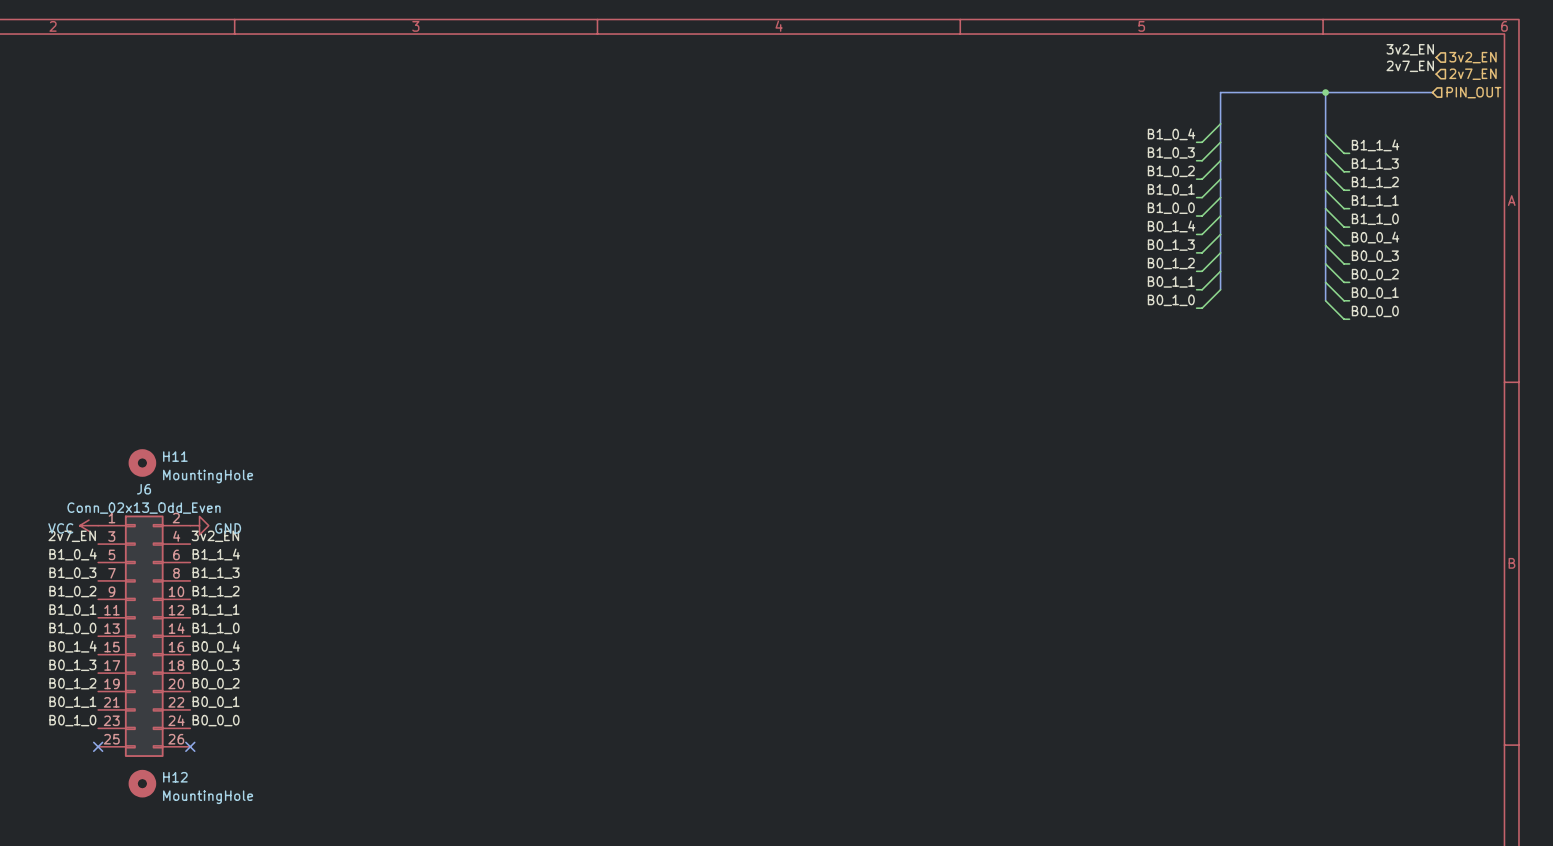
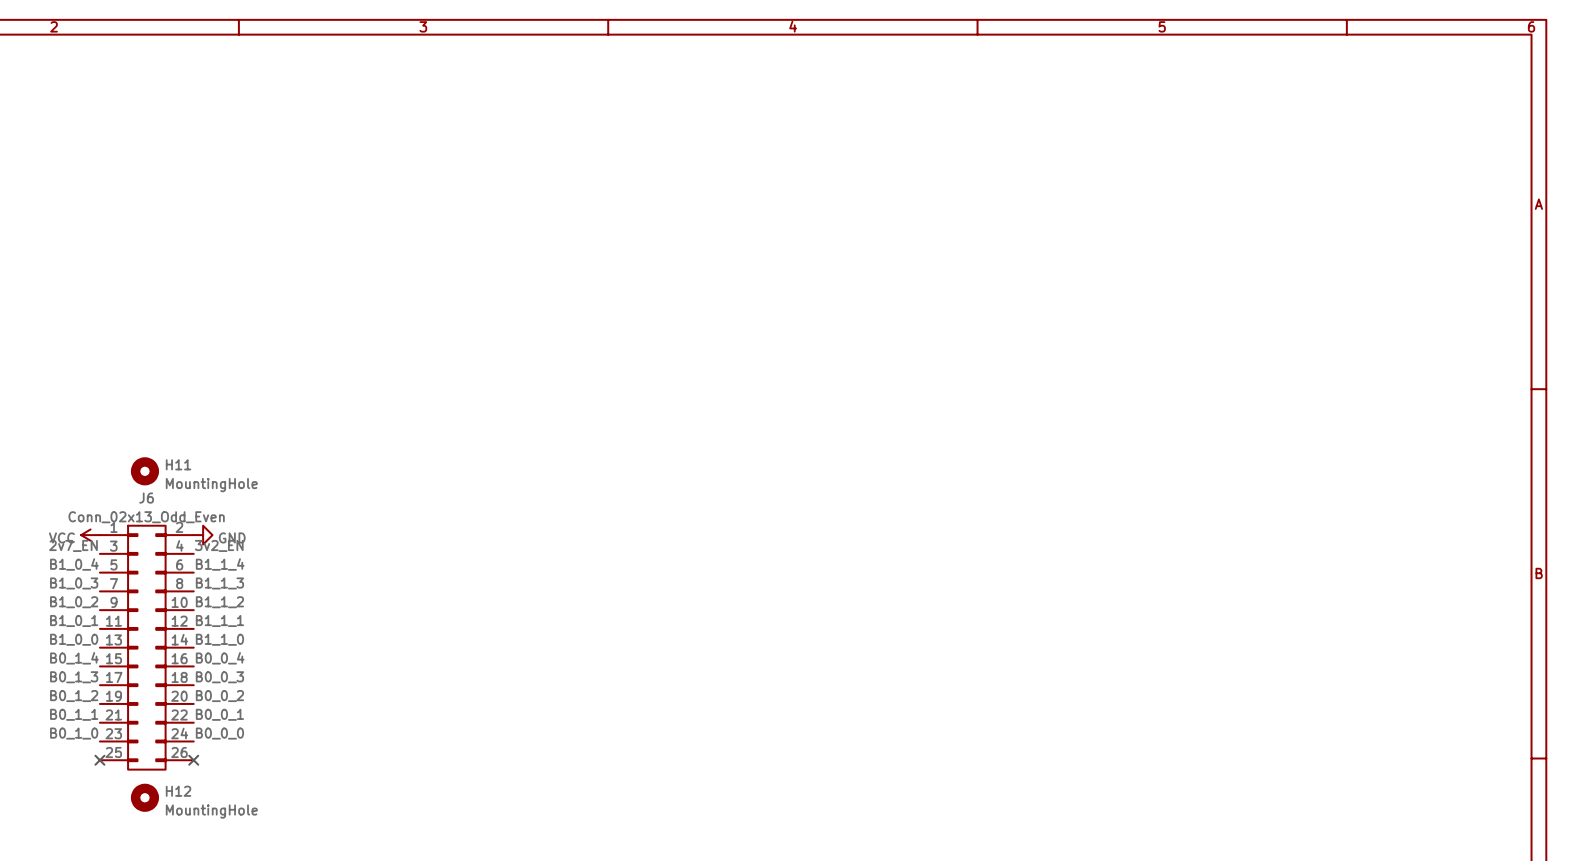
label: 3v2_EN (1410, 49) -> none
hierarchical label: 3v2_EN (1472, 57) -> none
label: 2v7_EN (1410, 66) -> none
hierarchical label: 2v7_EN (1472, 74) -> none
bus: (1325, 92) (1325, 300) -> none
junction: (1325, 92) -> none
bus: (1432, 92) (1220, 92) (1220, 289) -> none
hierarchical label: PIN_OUT (1473, 92) -> none
wire: (1220, 123) (1202, 142) (1196, 142) -> none
label: B1_0_4 (1171, 134) -> none
wire: (1325, 134) (1344, 153) (1349, 153) -> none
wire: (1220, 142) (1202, 160) (1196, 160) -> none
label: B1_1_4 (1375, 145) -> none
label: B1_0_3 (1171, 152) -> none
wire: (1325, 153) (1344, 171) (1349, 171) -> none
wire: (1220, 160) (1202, 179) (1196, 179) -> none
label: B1_1_3 (1375, 164) -> none
label: B1_0_2 (1171, 171) -> none
wire: (1325, 171) (1344, 190) (1349, 190) -> none
wire: (1220, 179) (1202, 197) (1196, 197) -> none
label: B1_1_2 (1375, 182) -> none
label: B1_0_1 (1171, 189) -> none
wire: (1325, 190) (1344, 208) (1349, 208) -> none
wire: (1220, 197) (1202, 216) (1196, 216) -> none
label: B1_1_1 (1375, 200) -> none
label: B1_0_0 (1171, 208) -> none
wire: (1325, 208) (1344, 227) (1349, 227) -> none
wire: (1220, 216) (1202, 234) (1196, 234) -> none
label: B1_1_0 (1375, 219) -> none
label: B0_1_4 (1171, 226) -> none
wire: (1325, 227) (1344, 245) (1349, 245) -> none
wire: (1220, 234) (1202, 252) (1196, 252) -> none
label: B0_0_4 (1375, 237) -> none
label: B0_1_3 (1171, 245) -> none
wire: (1325, 245) (1344, 263) (1349, 263) -> none
wire: (1220, 252) (1202, 271) (1196, 271) -> none
label: B0_0_3 (1375, 256) -> none
label: B0_1_2 (1171, 263) -> none
wire: (1325, 263) (1344, 282) (1349, 282) -> none
wire: (1220, 271) (1202, 289) (1196, 289) -> none
label: B0_0_2 (1375, 274) -> none
label: B0_1_1 (1171, 281) -> none
wire: (1325, 282) (1344, 300) (1349, 300) -> none
wire: (1220, 289) (1202, 308) (1196, 308) -> none
label: B0_0_1 (1375, 293) -> none
label: B0_1_0 (1171, 300) -> none
wire: (1325, 300) (1344, 319) (1349, 319) -> none
label: B0_0_0 (1375, 311) -> none

